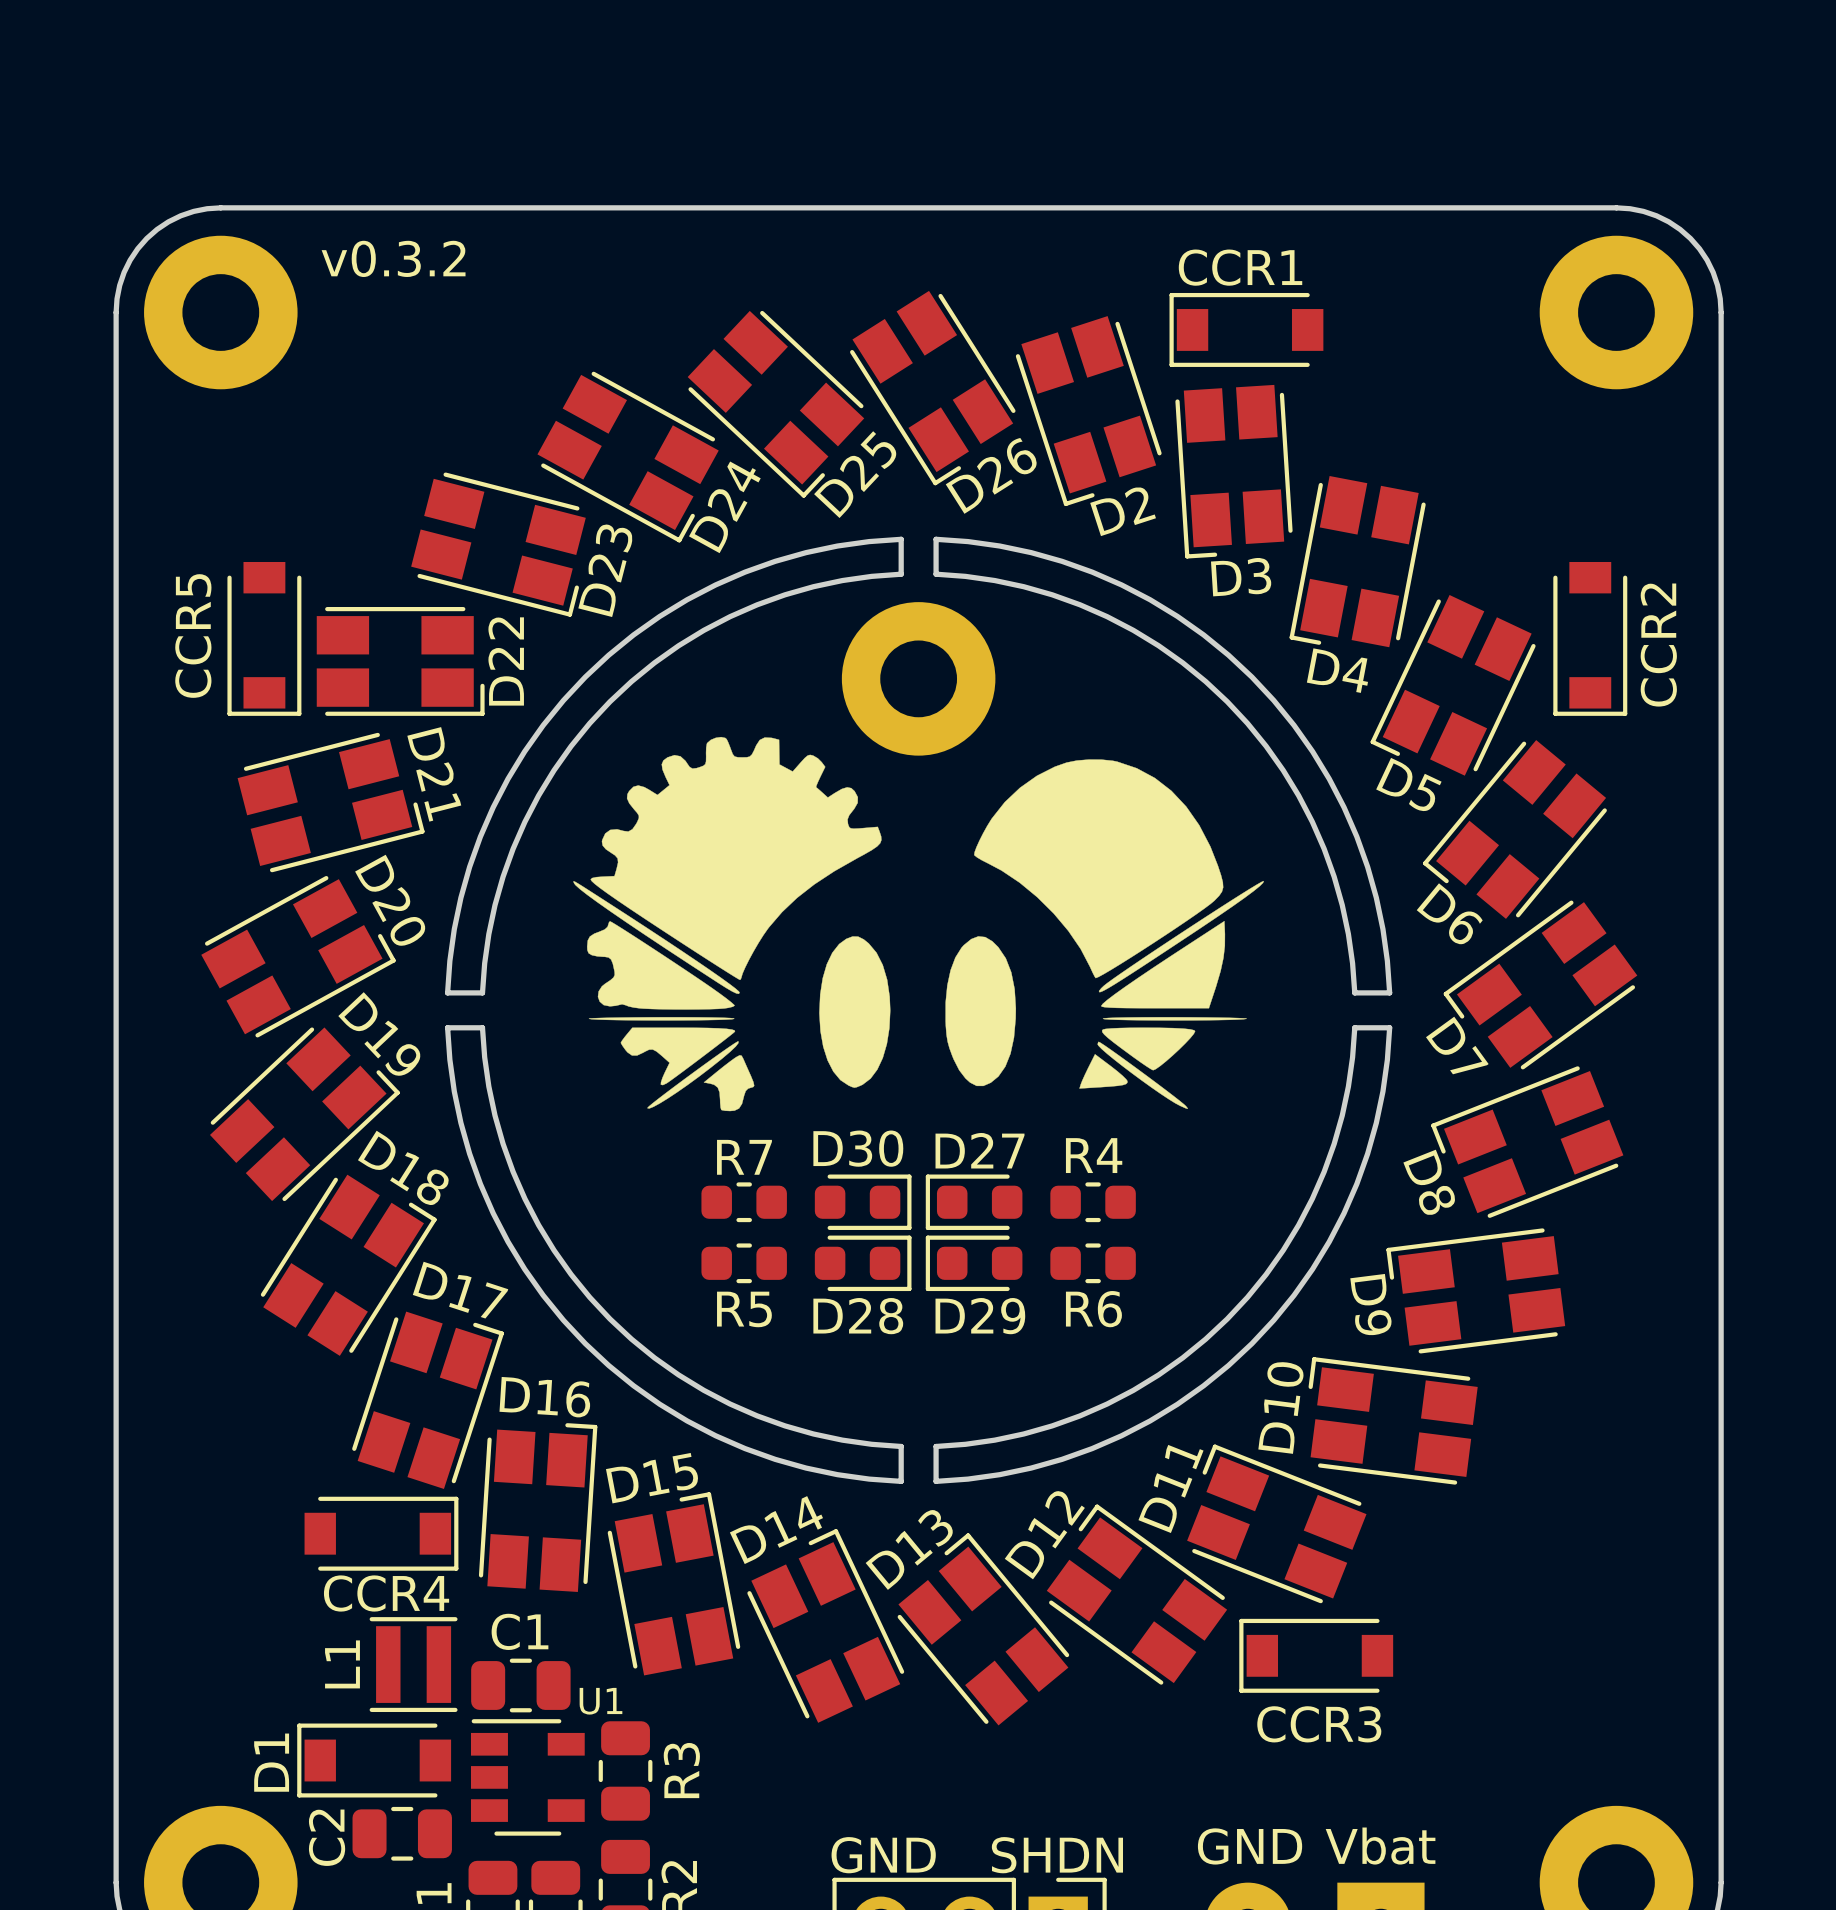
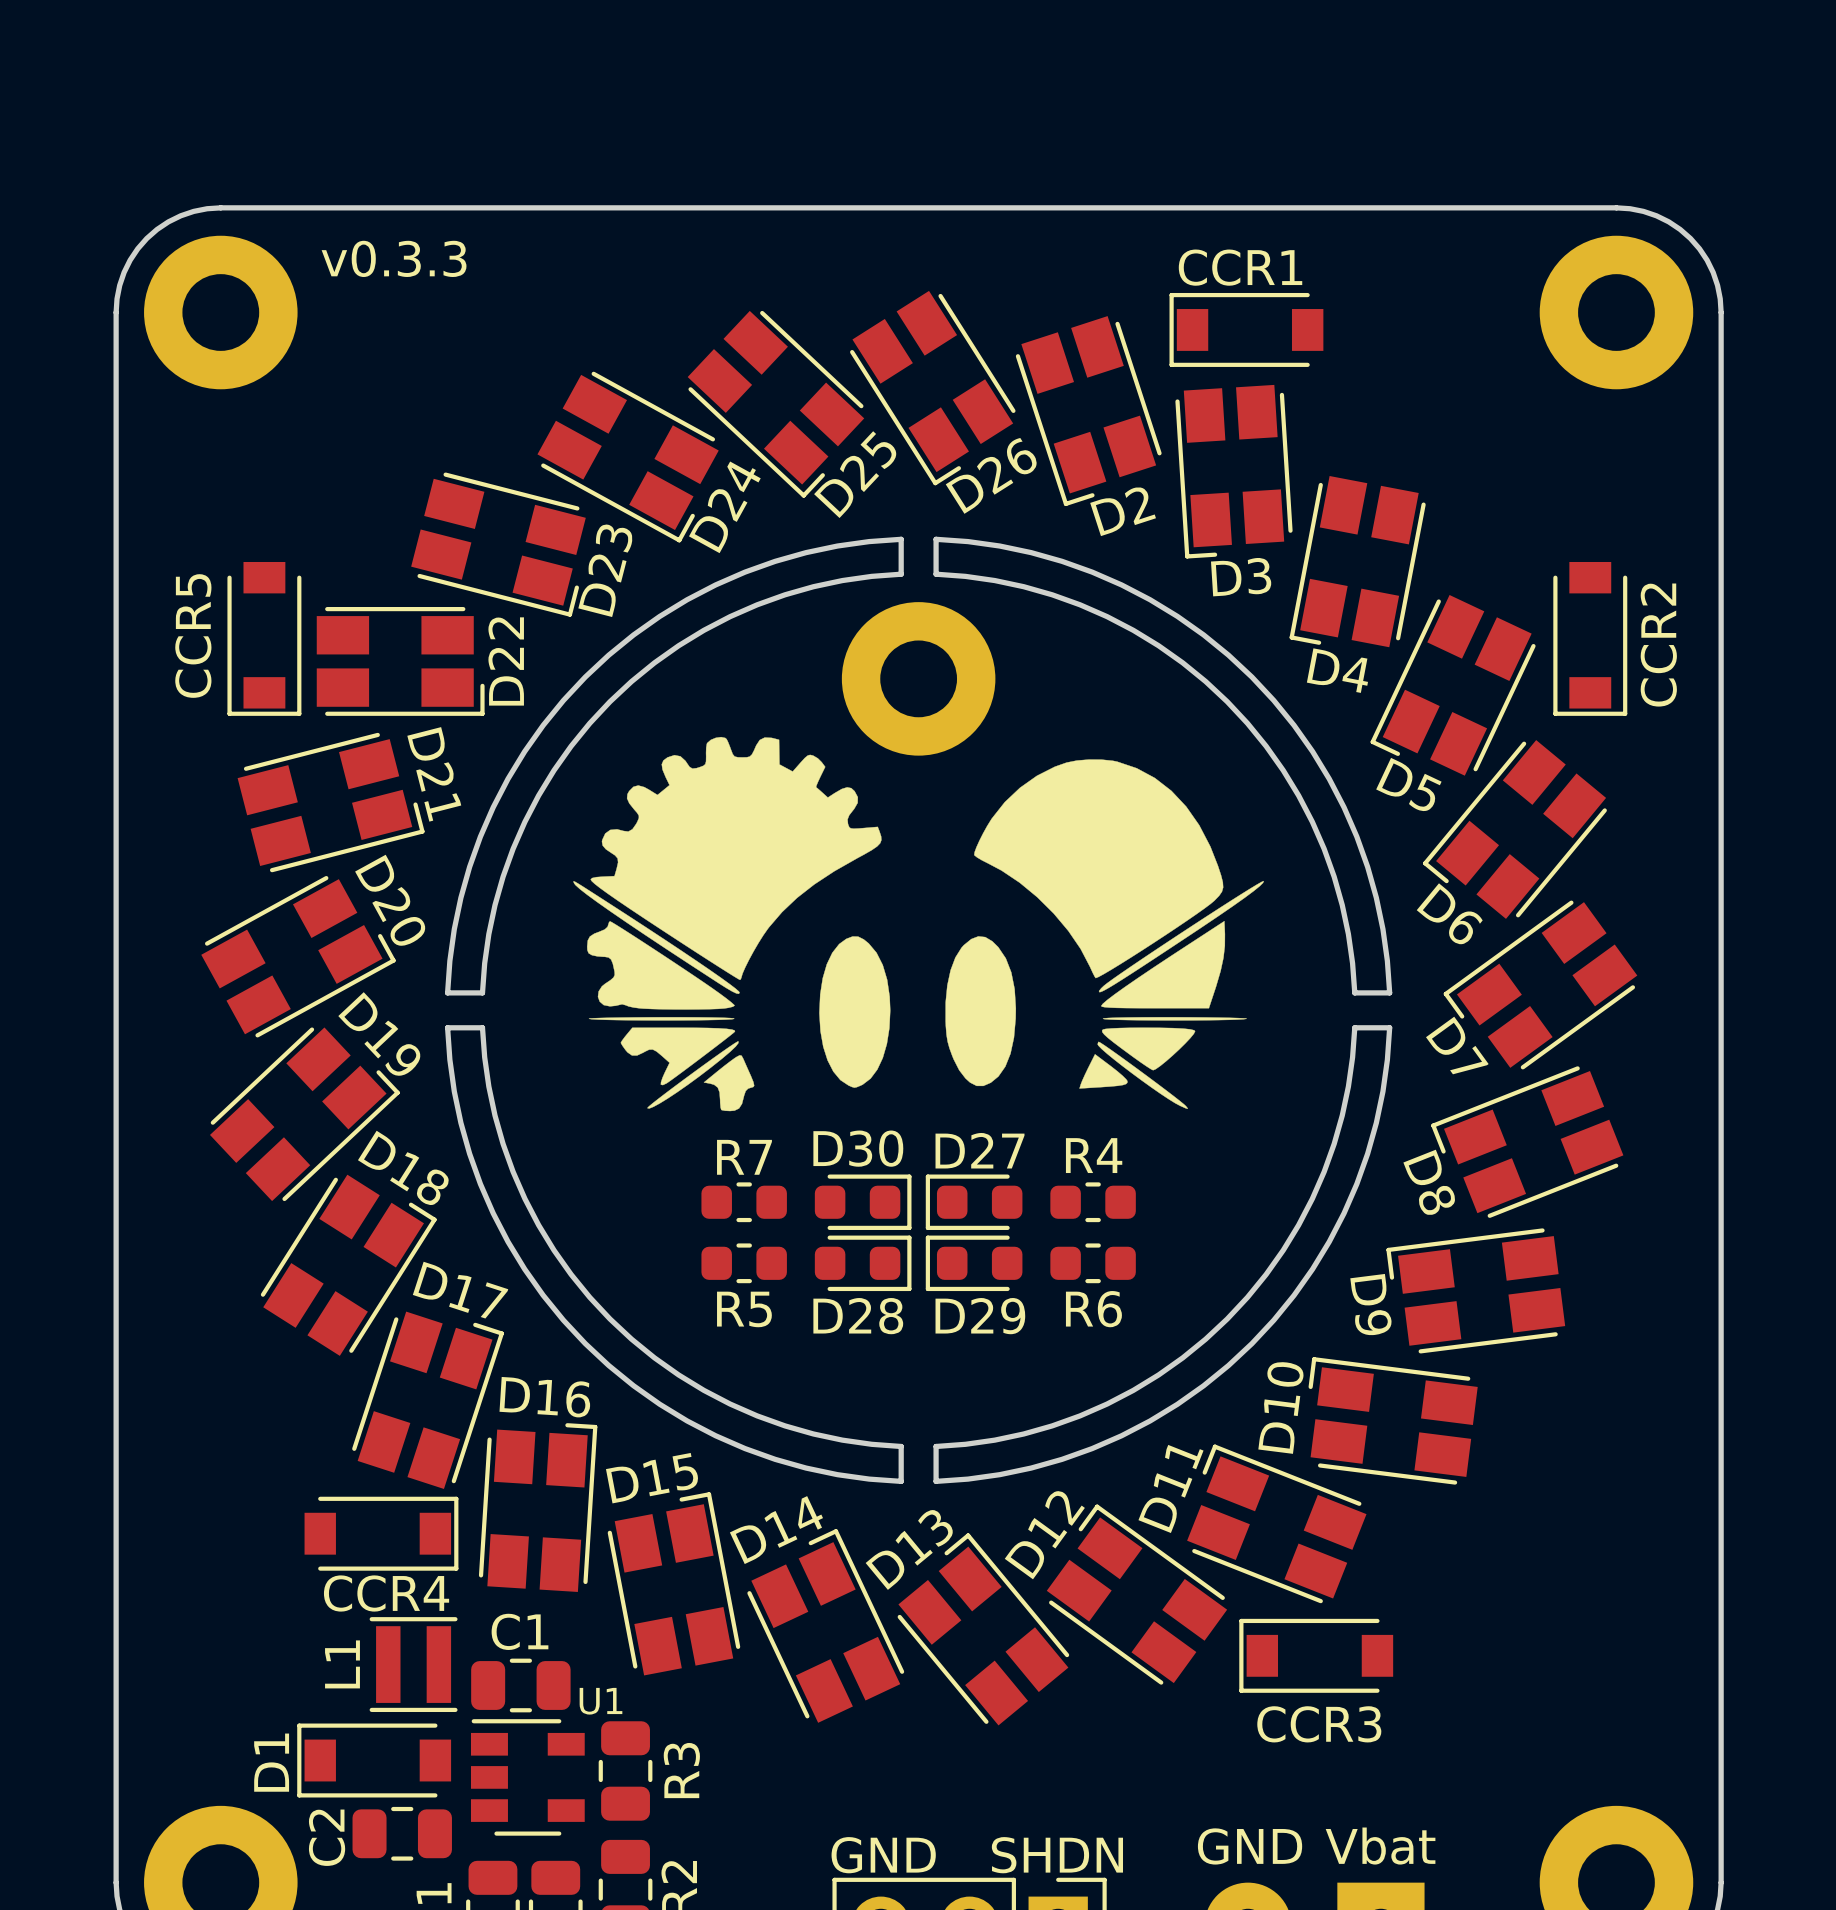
text: v0.3.2 (393, 258) -> v0.3.3 (394, 258)

